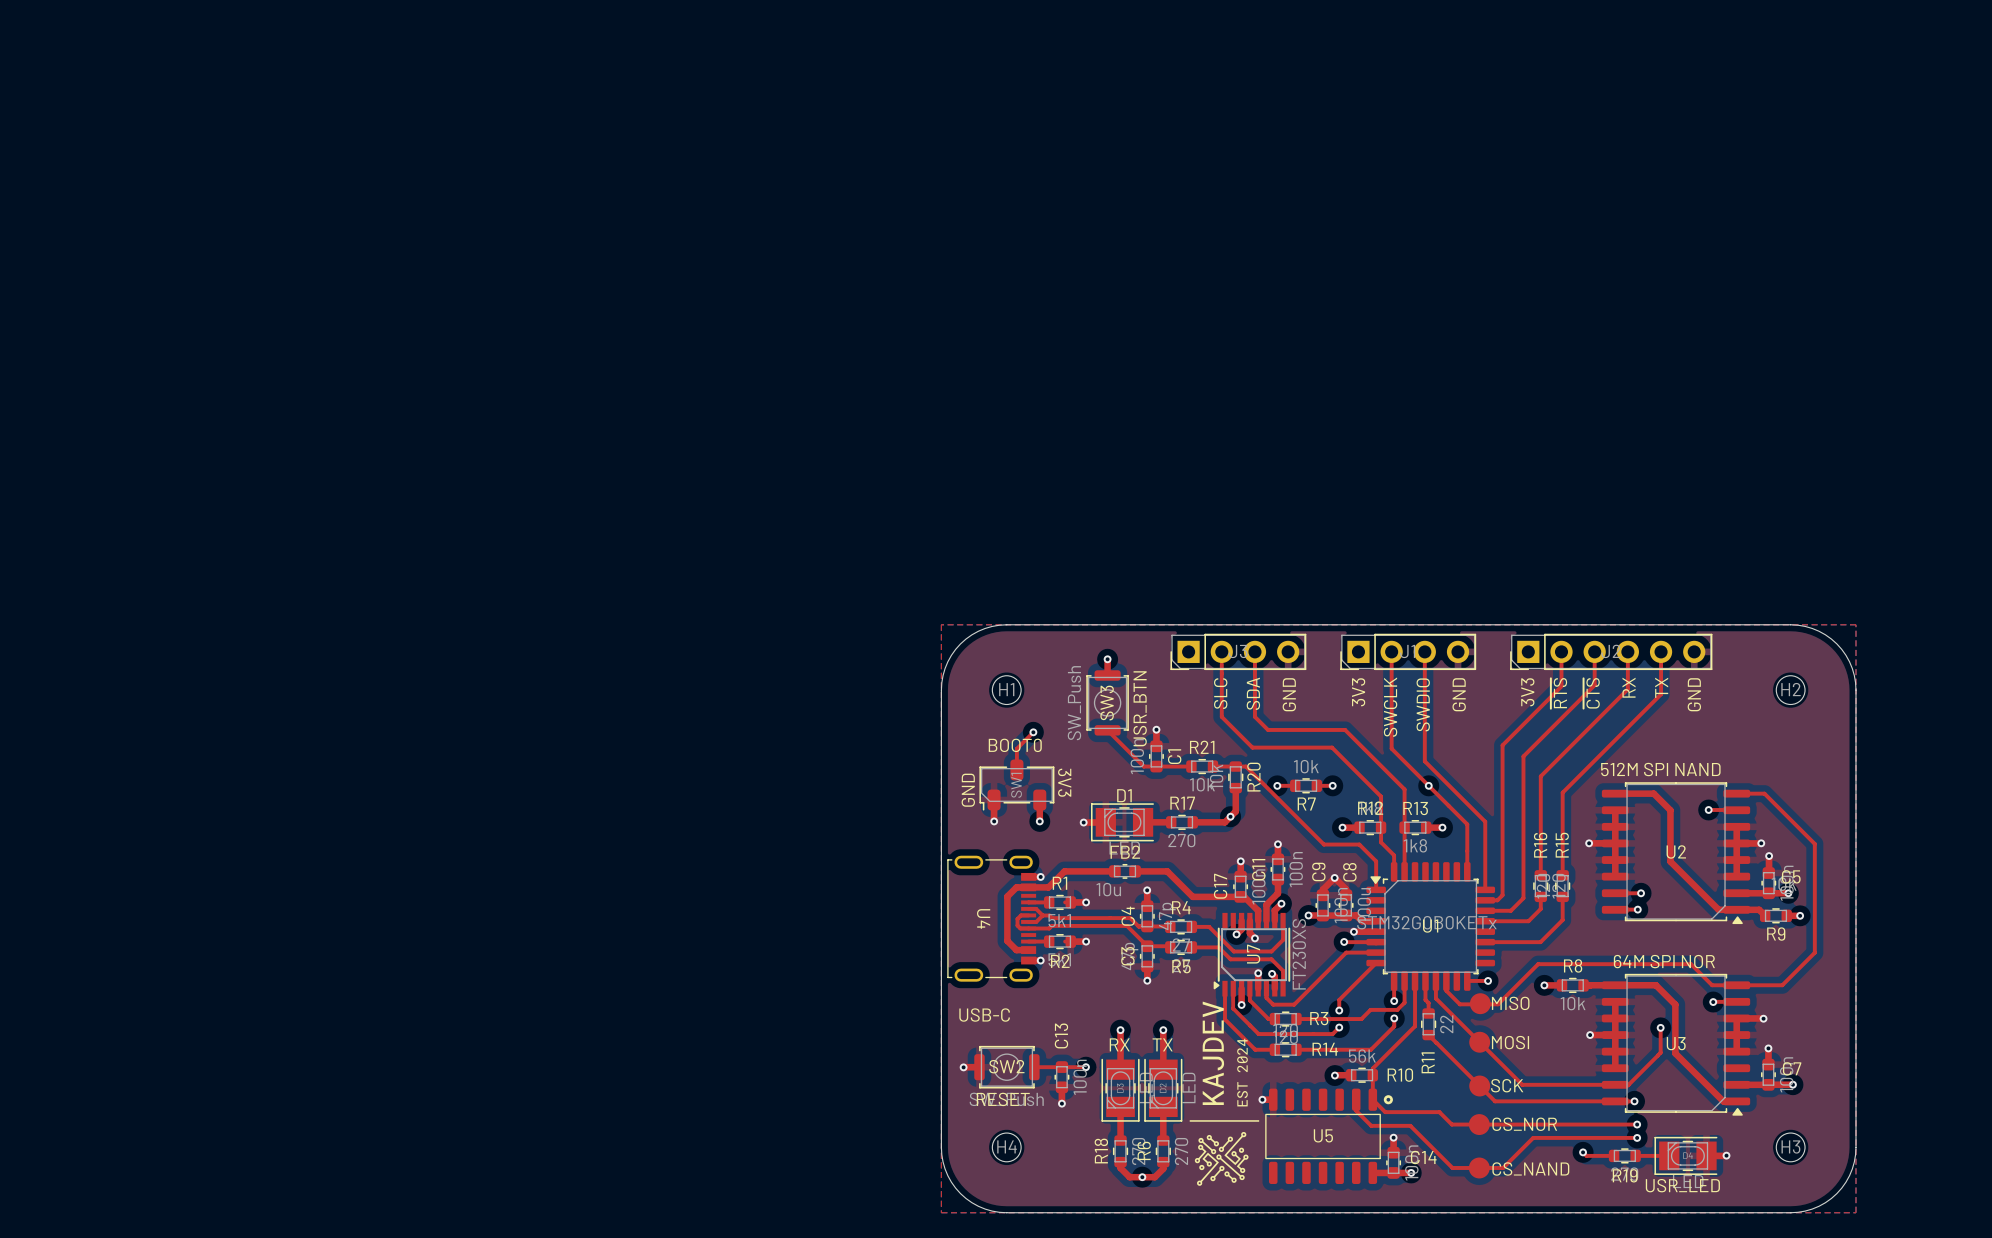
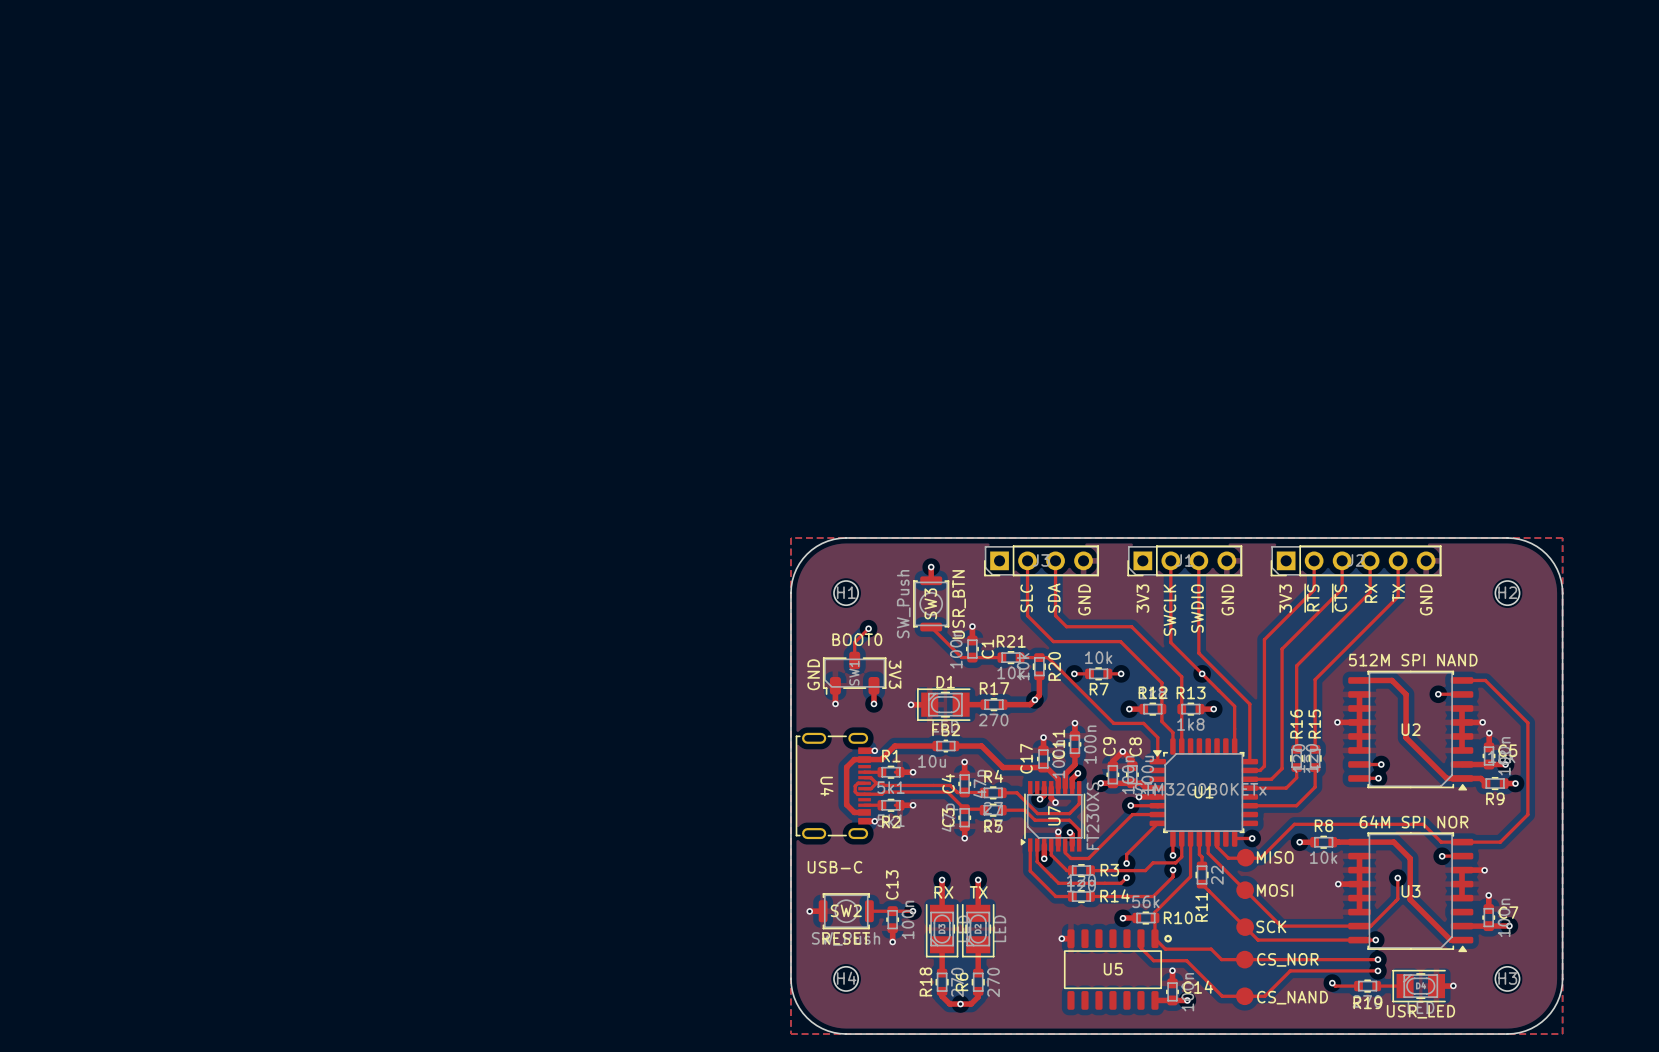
drawing: [1189, 1001, 1260, 1186] -> none

